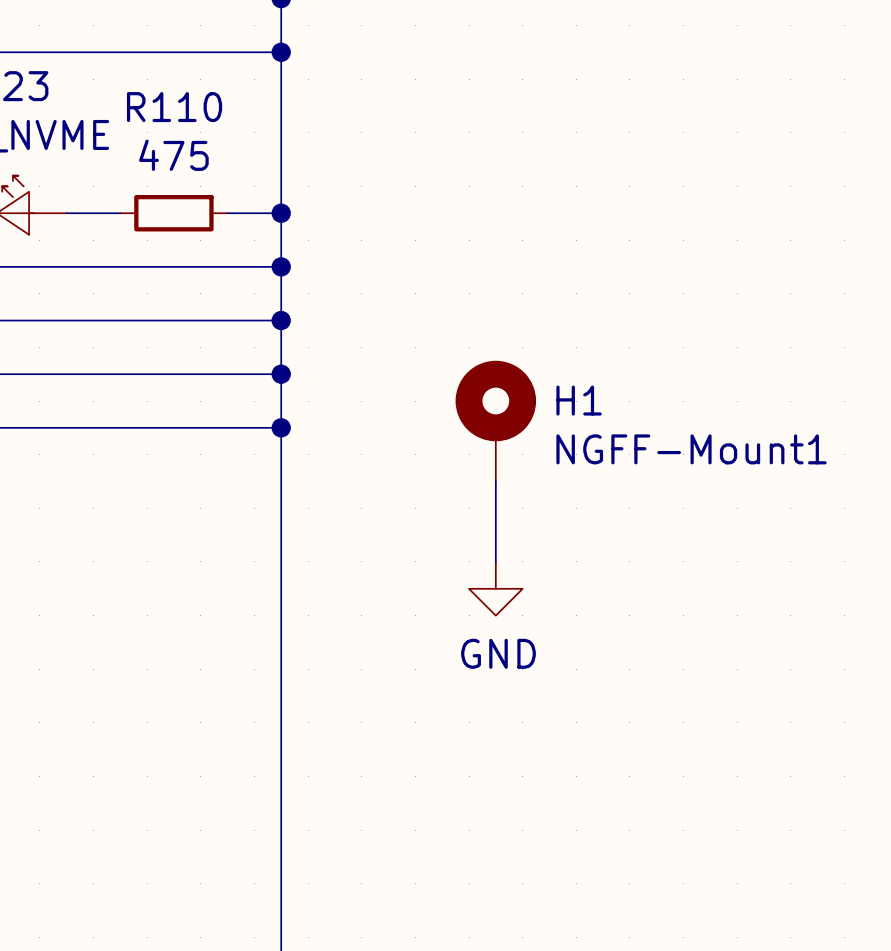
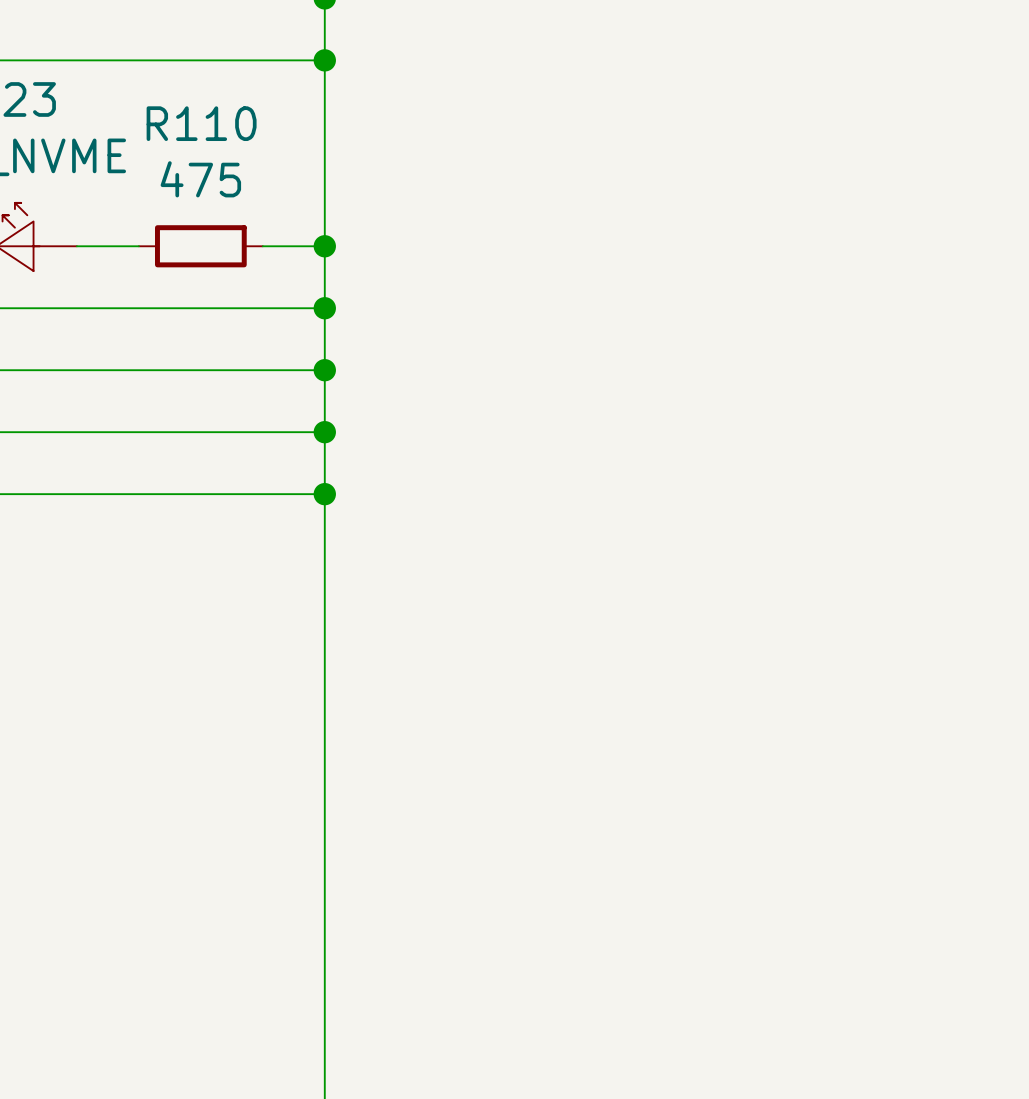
H1: NGFF-Mount1 (495, 421) -> none
wire: (495, 481) (495, 561) -> none
power symbol: GND (495, 588) -> none

